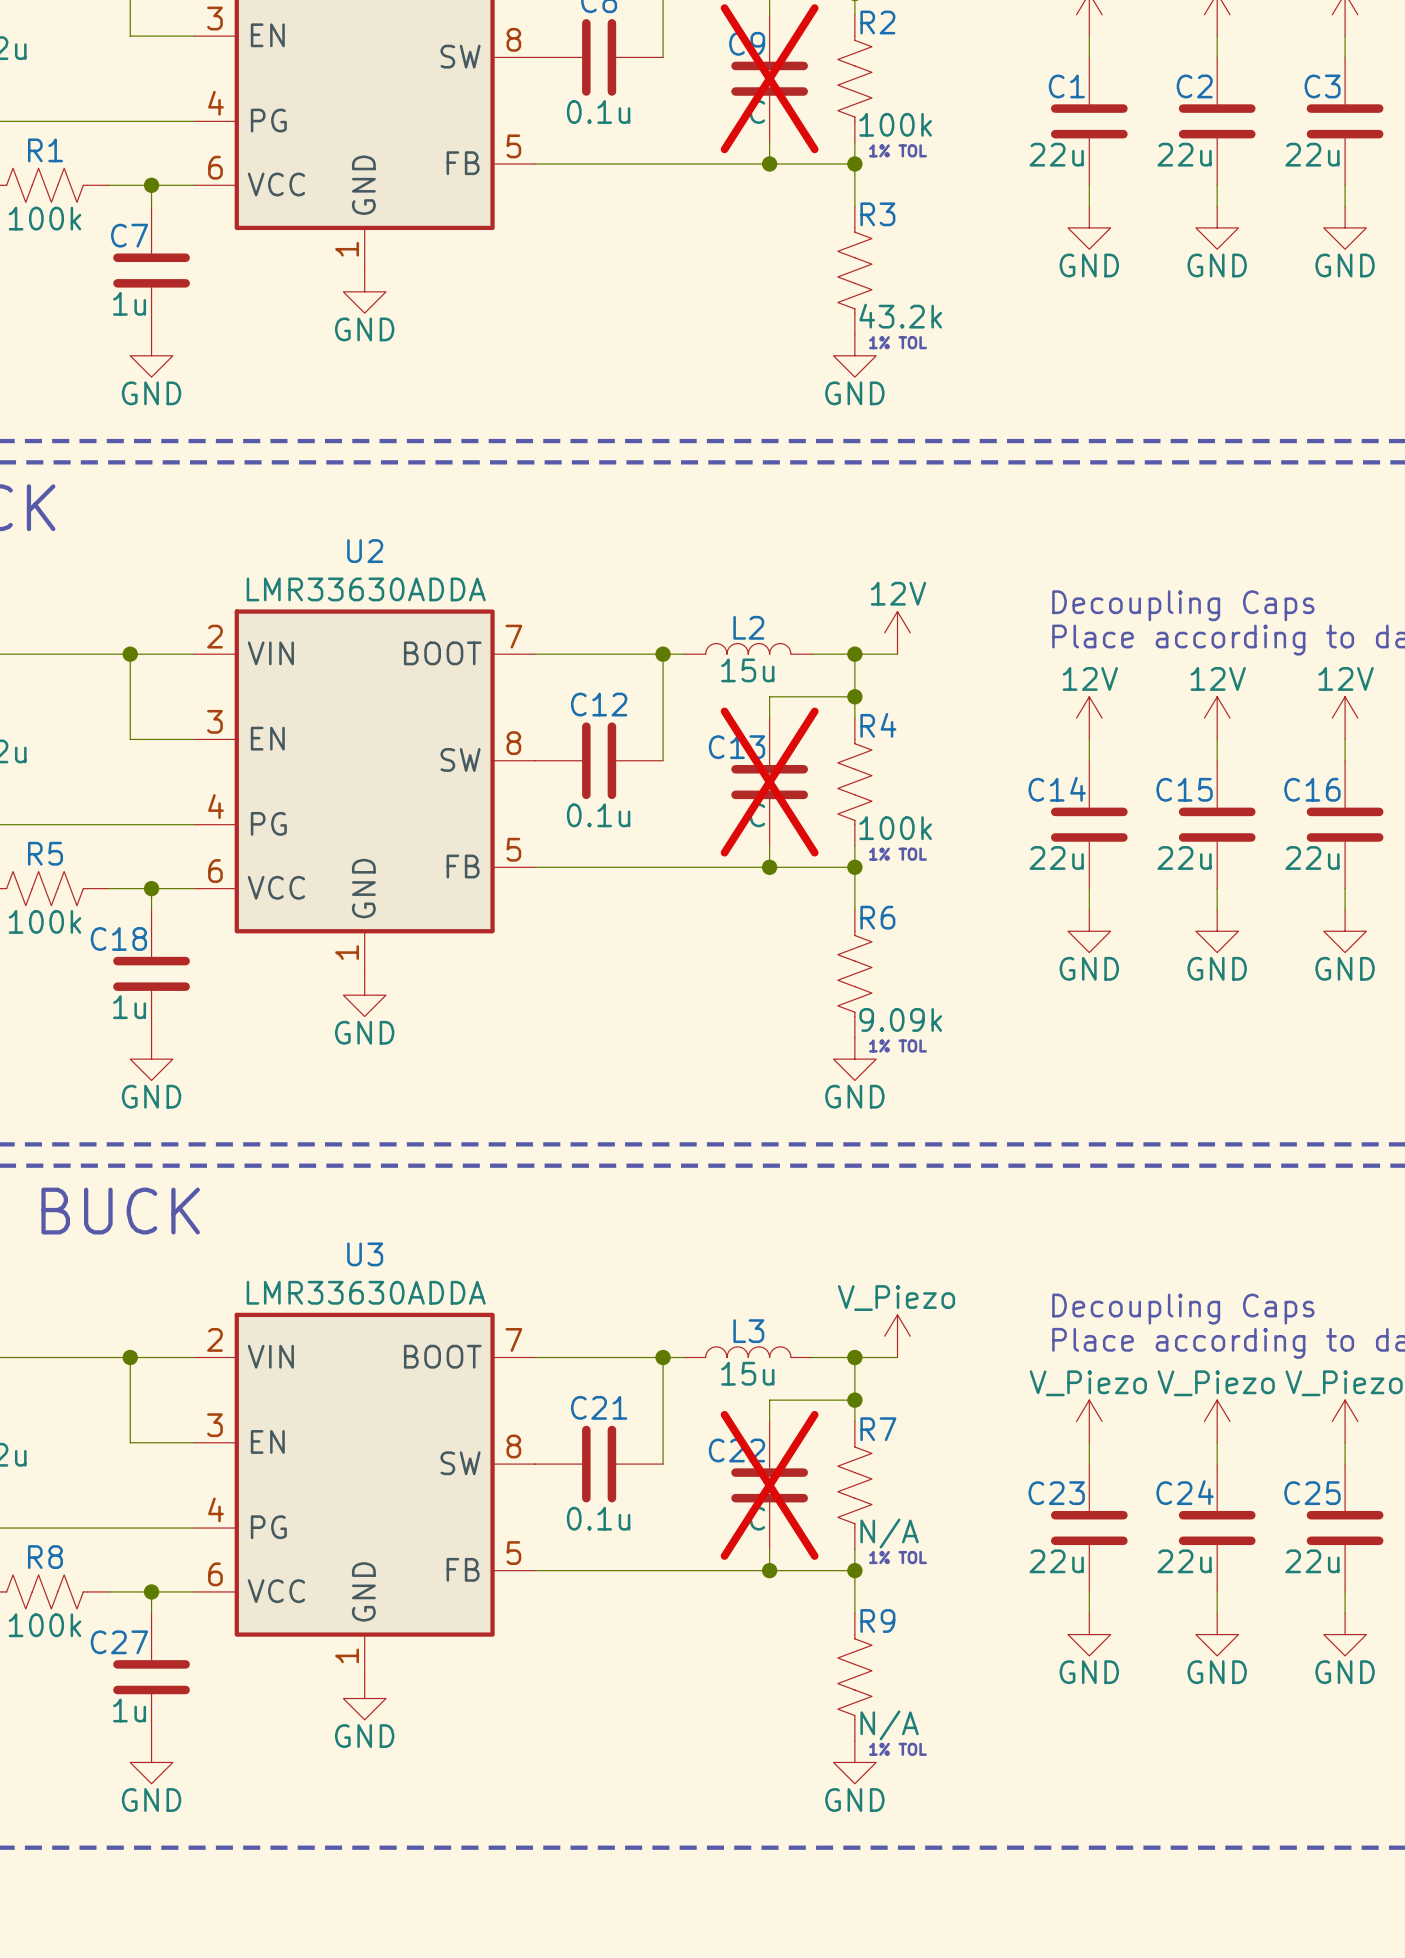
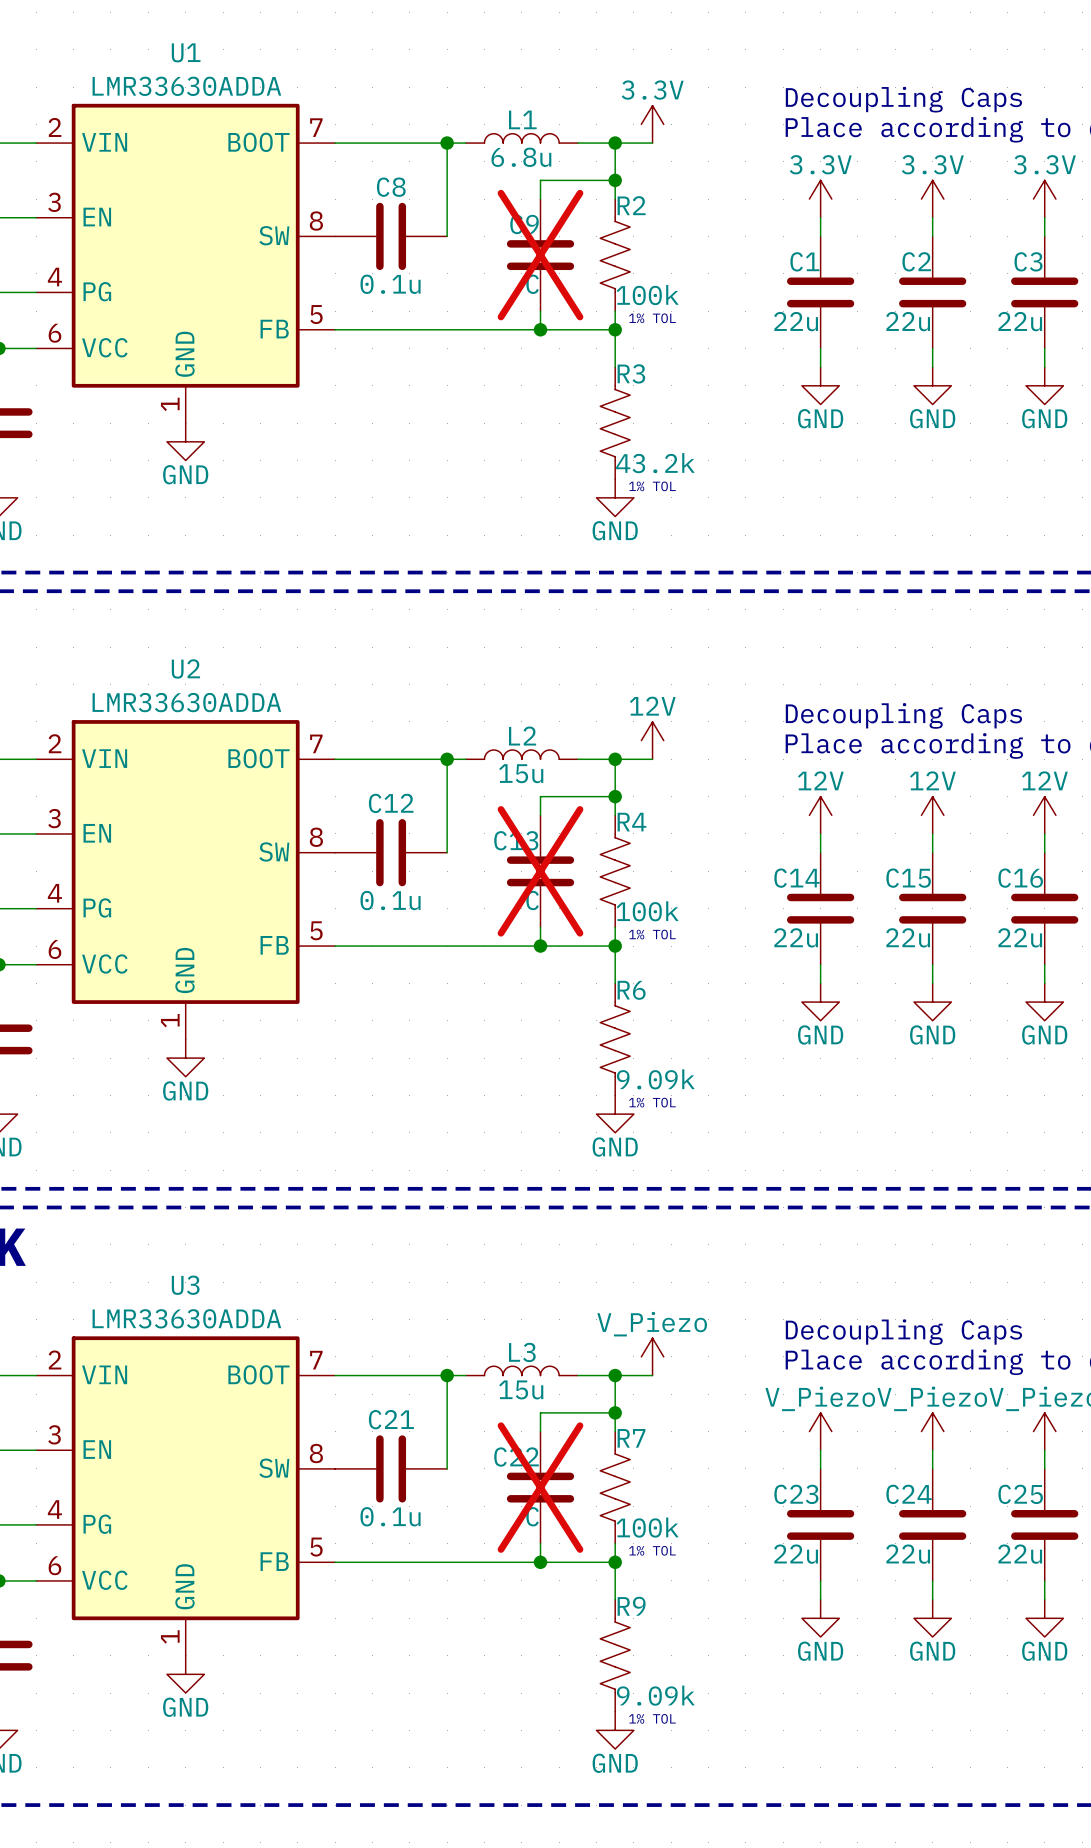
R7 value: N/A (889, 1533) -> 100k (647, 1527)
R9 value: N/A (889, 1725) -> 9.09k (655, 1695)

